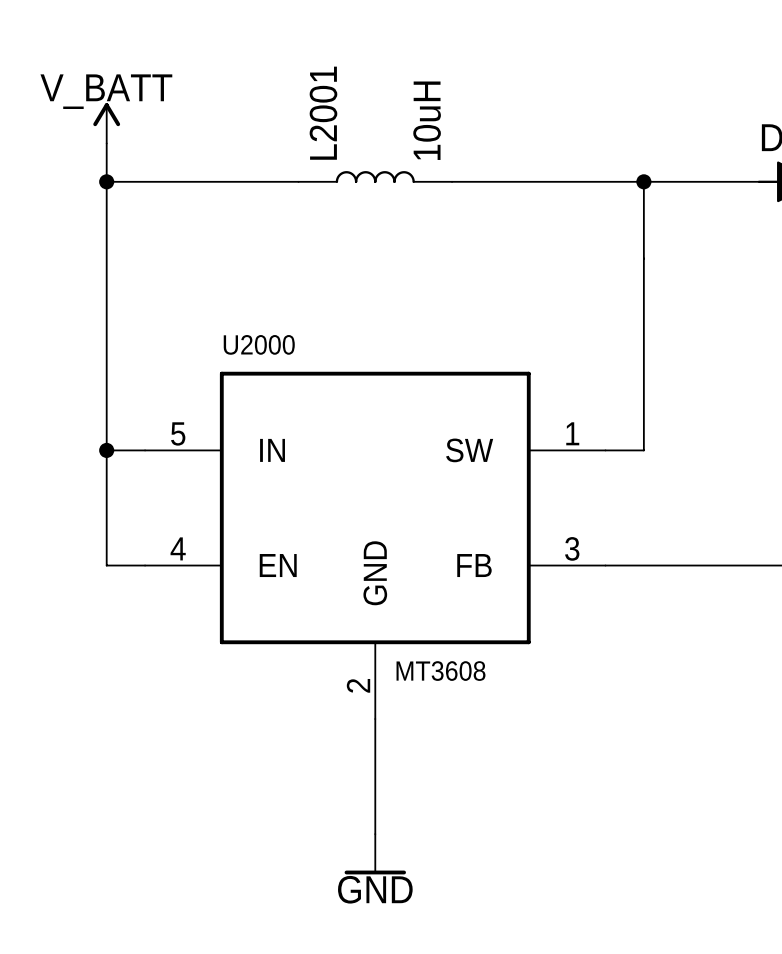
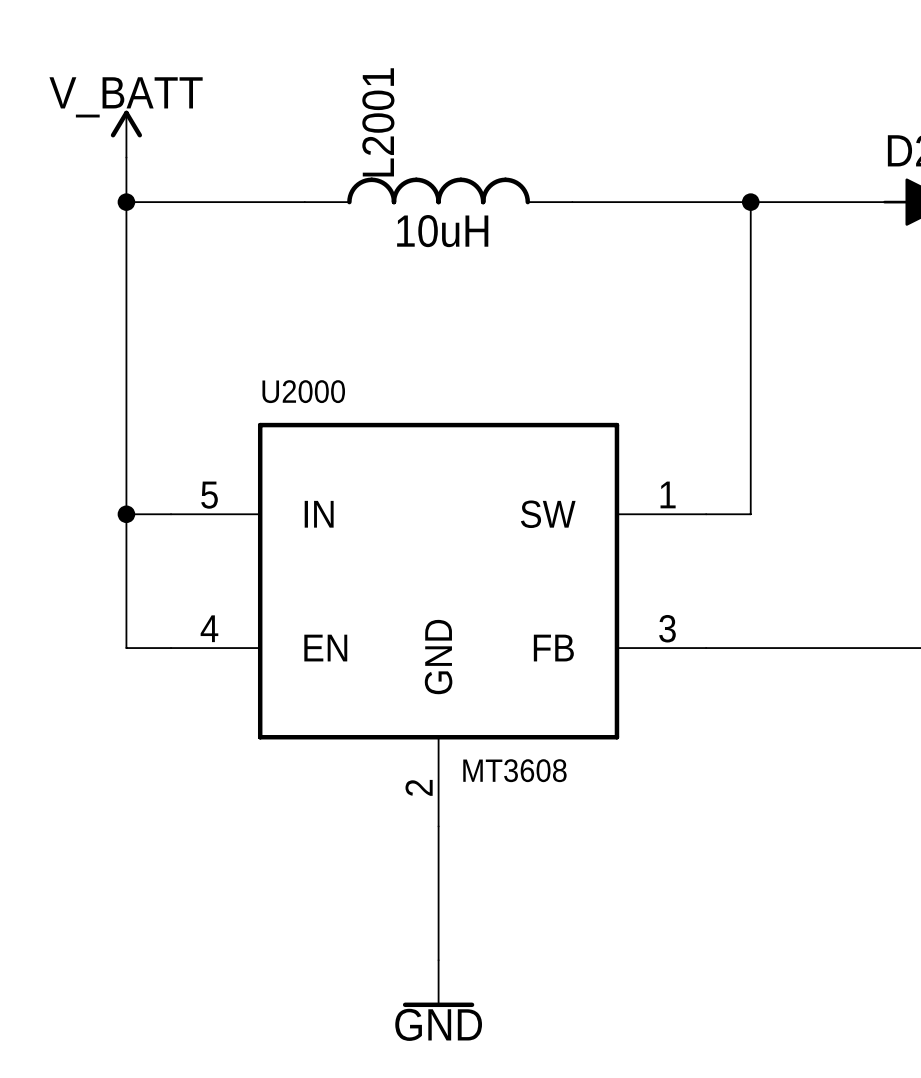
L2001 value: 10uH (427, 120) -> none
L2001 symbol: [298, 171, 453, 183] -> [304, 177, 573, 205]
text: none -> 10uH (442, 231)

